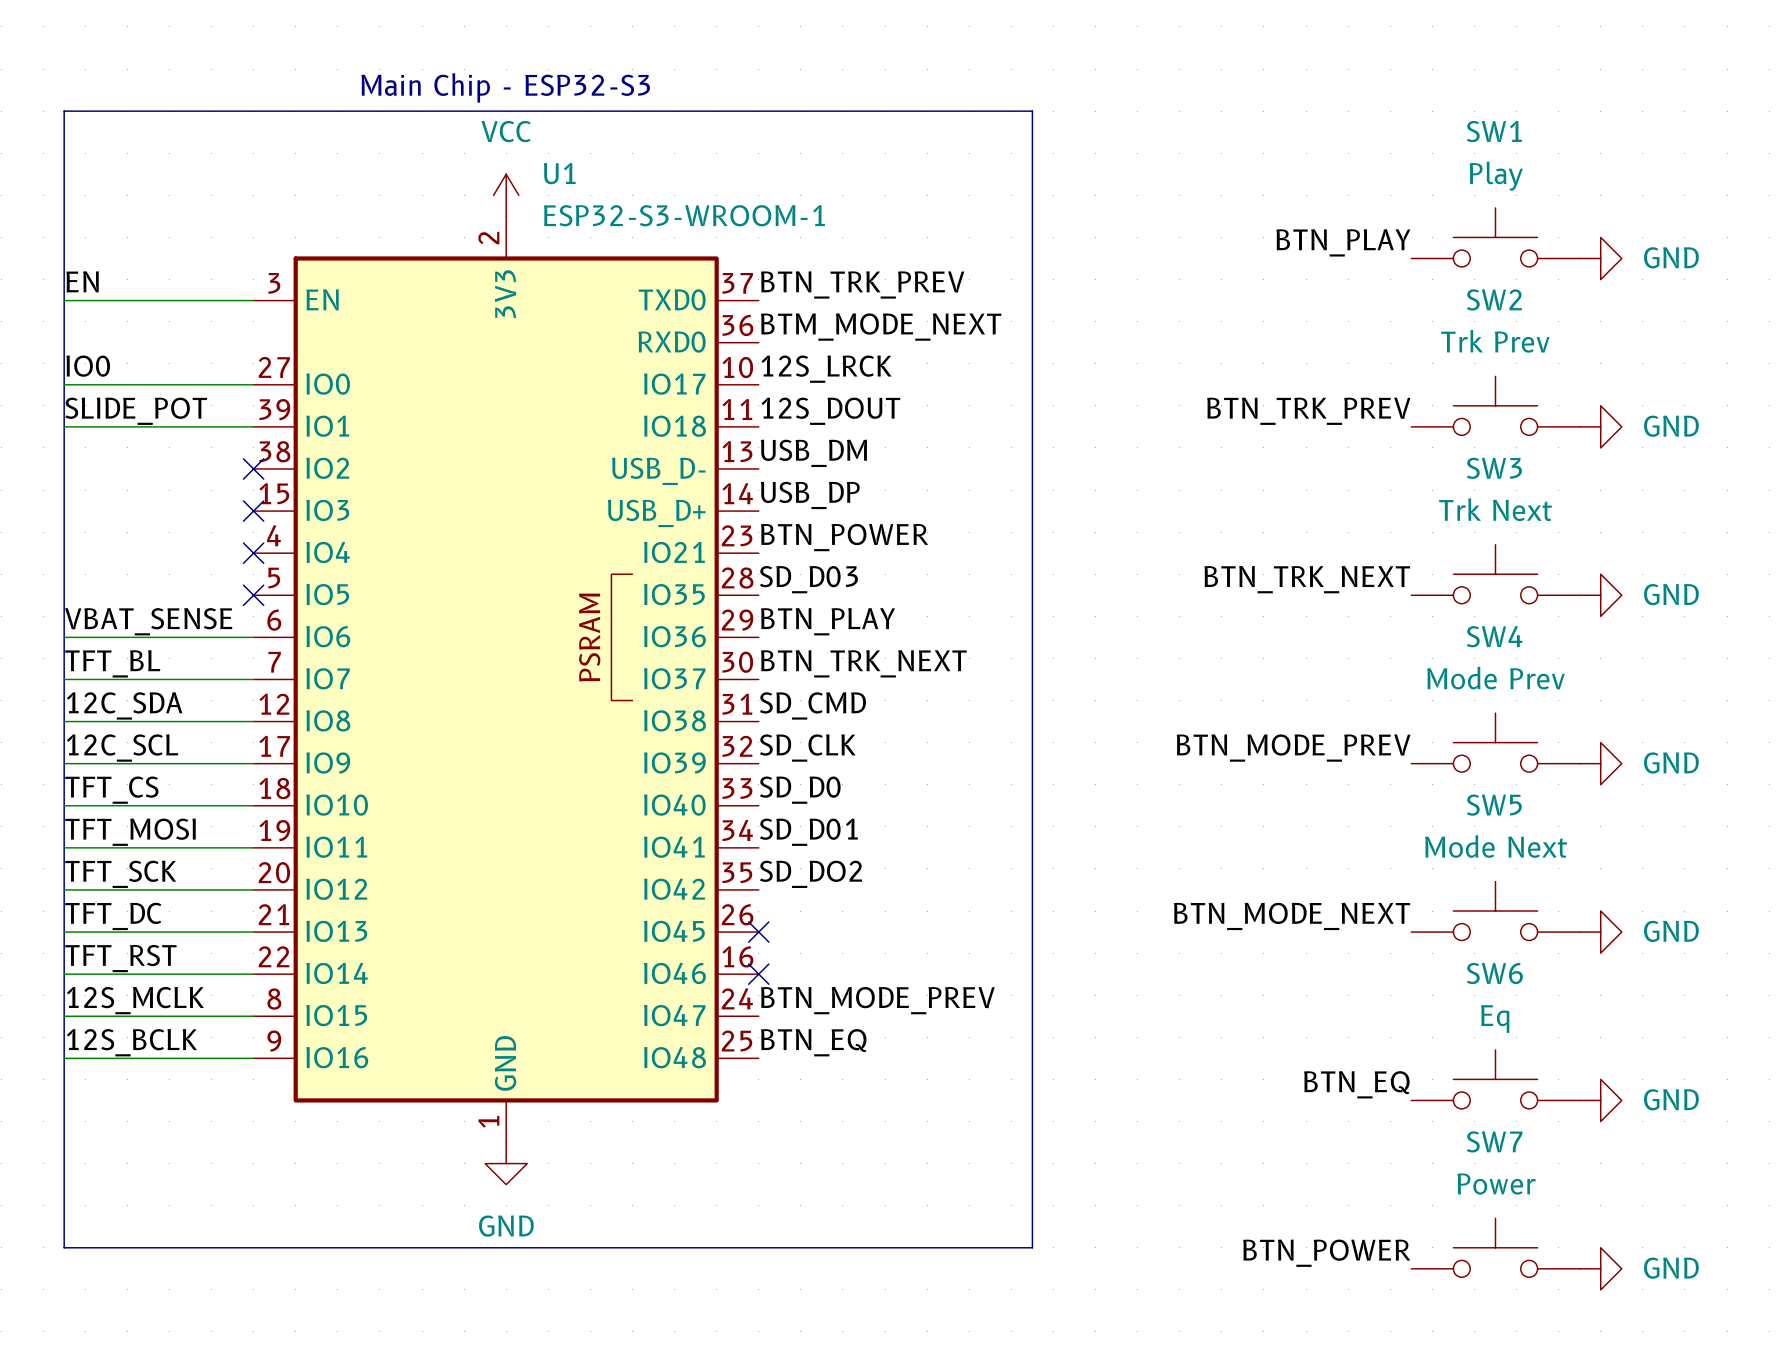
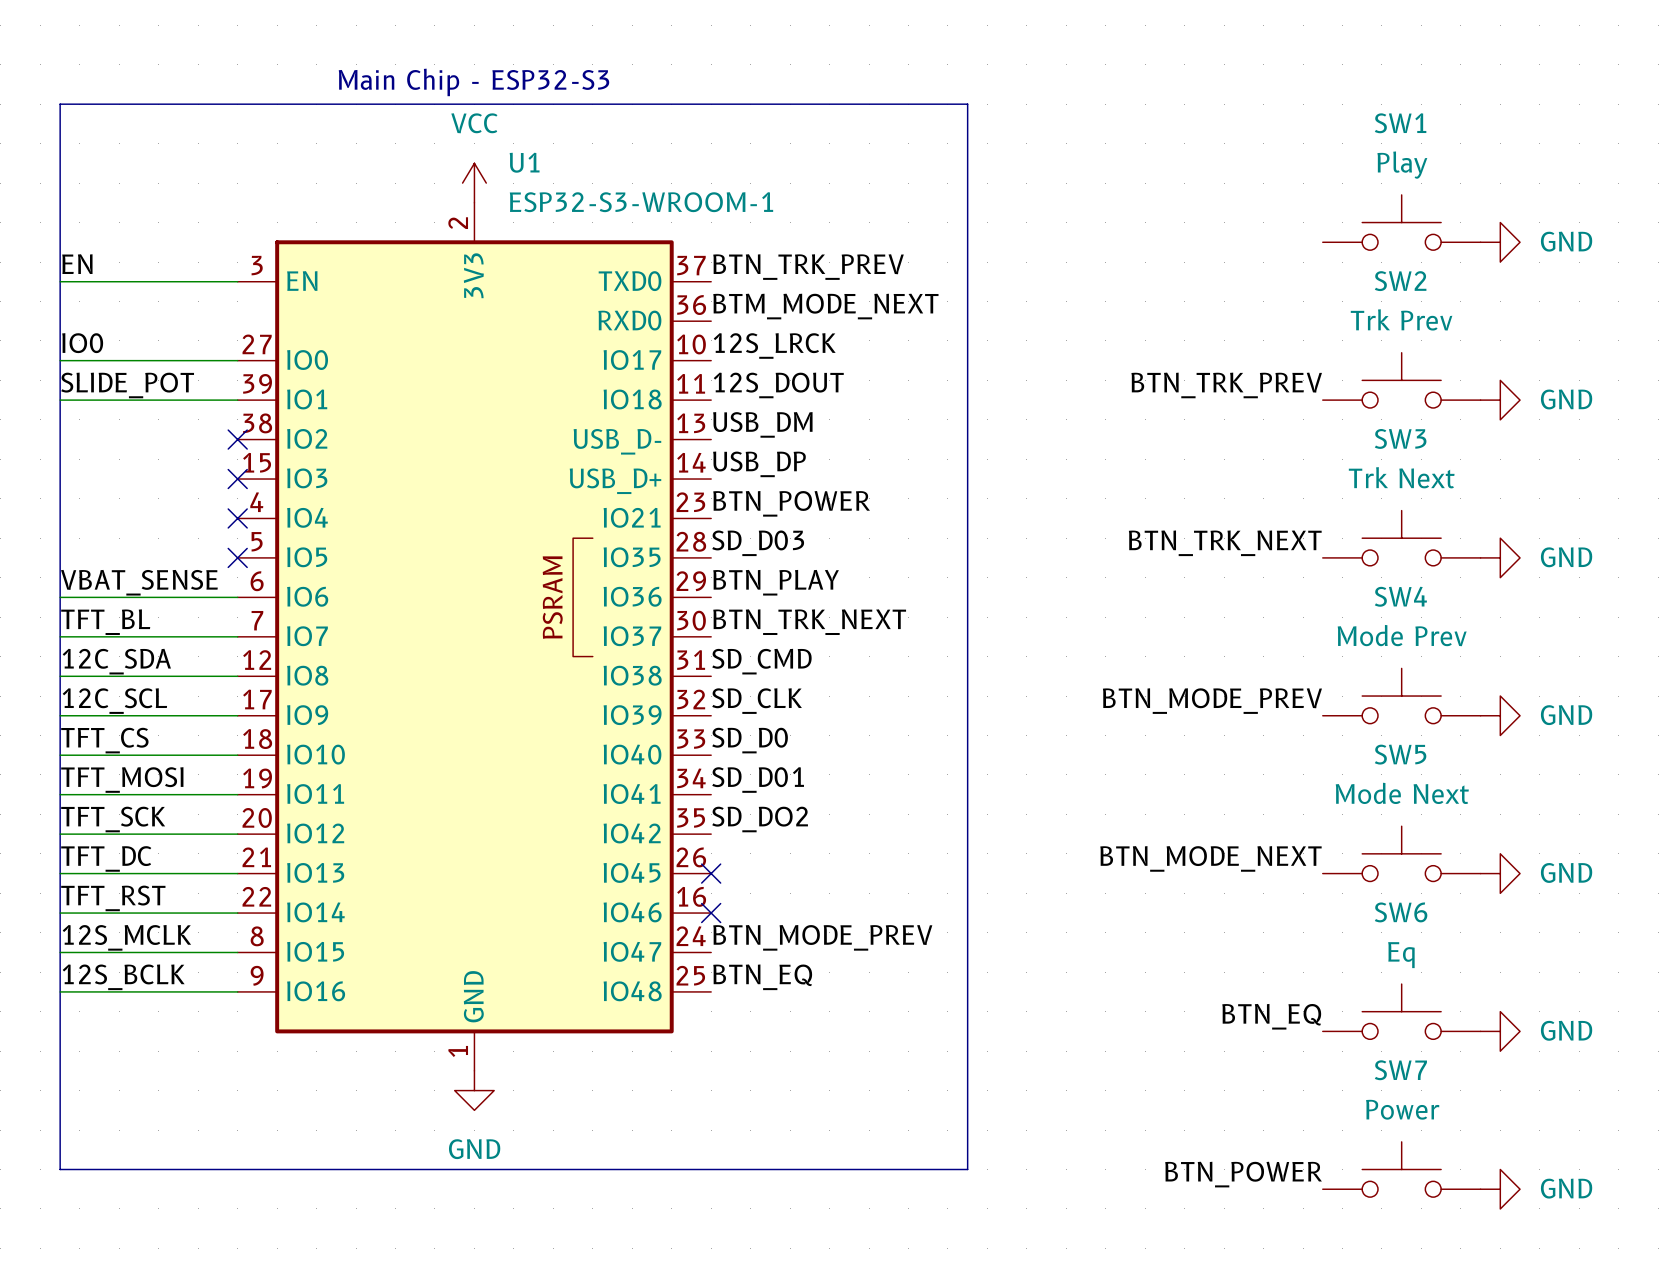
label: BTN_PLAY (1343, 242) -> none

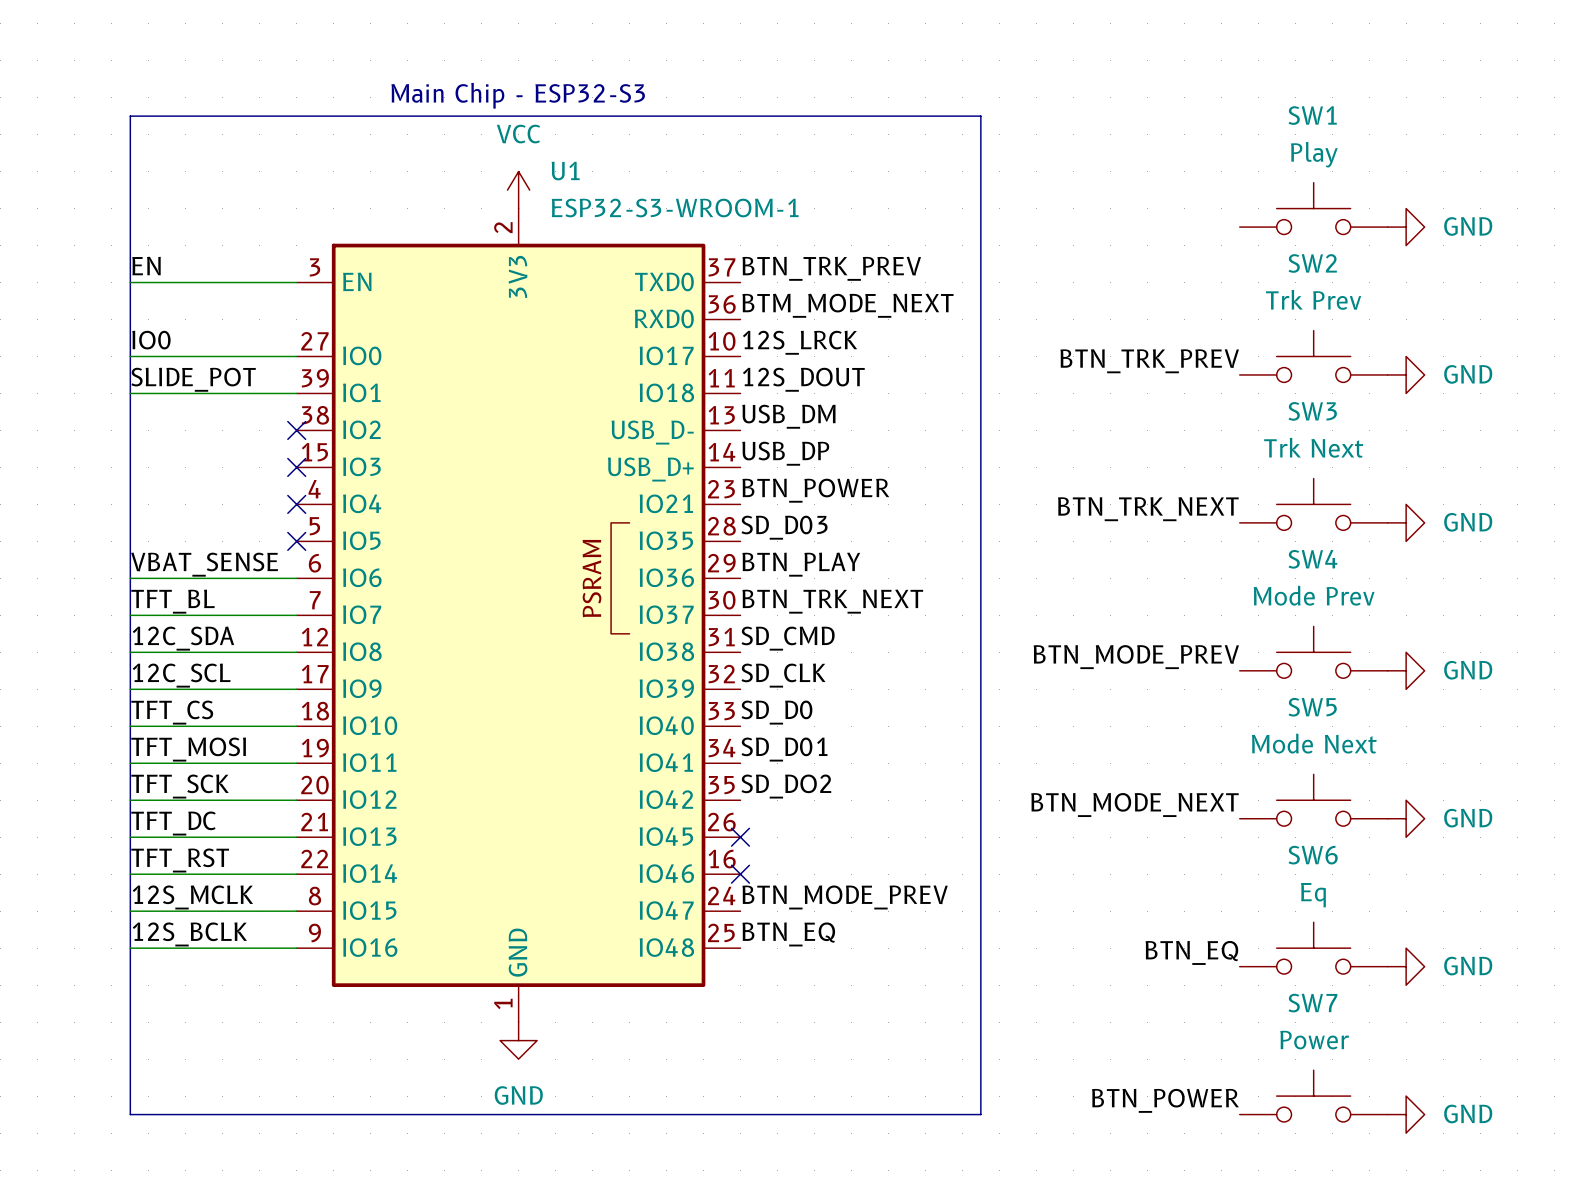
text position: Main Chip - ESP32-S3 (473, 82) -> Main Chip - ESP32-S3 (518, 95)
line: (60, 104) (967, 104) (967, 1169) (60, 1169) (60, 104) -> (130, 116) (980, 116) (980, 1114) (130, 1114) (130, 116)
power symbol position: VCC (474, 183) -> VCC (518, 190)
label position: EN (77, 264) -> EN (146, 266)
label position: BTN_TRK_PREV (808, 267) -> BTN_TRK_PREV (831, 268)
wire: (60, 281) (237, 281) -> (130, 282) (296, 282)
label position: BTM_MODE_NEXT (825, 306) -> BTM_MODE_NEXT (847, 305)
label position: IO0 (82, 343) -> IO0 (151, 340)
label position: 12S_LRCK (774, 345) -> 12S_LRCK (800, 342)
wire: (60, 360) (237, 360) -> (130, 356) (296, 356)
label position: SLIDE_POT (127, 385) -> SLIDE_POT (193, 379)
label position: 12S_DOUT (778, 385) -> 12S_DOUT (803, 379)
wire: (60, 400) (237, 400) -> (130, 393) (296, 393)
label position: USB_DM (762, 424) -> USB_DM (788, 416)
no-connect mark: (237, 439) -> none
no-connect mark: none -> (296, 430)
label position: USB_DP (759, 464) -> USB_DP (785, 453)
no-connect mark: (237, 479) -> none
no-connect mark: none -> (296, 467)
label position: BTN_POWER (791, 503) -> BTN_POWER (815, 490)
no-connect mark: (237, 518) -> none
no-connect mark: none -> (296, 504)
label position: SD_D03 (758, 543) -> SD_D03 (784, 527)
no-connect mark: (237, 557) -> none
no-connect mark: none -> (296, 541)
label position: VBAT_SENSE (139, 582) -> VBAT_SENSE (204, 564)
label position: BTN_PLAY (776, 582) -> BTN_PLAY (801, 564)
wire: (60, 597) (237, 597) -> (130, 578) (296, 578)
label position: TFT_BL (105, 622) -> TFT_BL (173, 601)
label position: BTN_TRK_NEXT (809, 622) -> BTN_TRK_NEXT (832, 601)
wire: (60, 636) (237, 636) -> (130, 615) (296, 615)
U1 position: (474, 636) -> (518, 615)
label position: 12C_SDA (116, 661) -> 12C_SDA (183, 638)
label position: SD_CMD (761, 661) -> SD_CMD (788, 638)
wire: (60, 676) (237, 676) -> (130, 652) (296, 652)
label position: 12C_SCL (114, 701) -> 12C_SCL (181, 675)
label position: SD_CLK (757, 701) -> SD_CLK (783, 675)
wire: (60, 715) (237, 715) -> (130, 689) (296, 689)
label position: TFT_CS (104, 740) -> TFT_CS (172, 712)
label position: SD_D0 (750, 740) -> SD_D0 (776, 712)
wire: (60, 755) (237, 755) -> (130, 726) (296, 726)
label position: TFT_MOSI (122, 780) -> TFT_MOSI (188, 749)
label position: SD_D01 (758, 780) -> SD_D01 (784, 749)
wire: (60, 794) (237, 794) -> (130, 763) (296, 763)
label position: TFT_SCK (113, 819) -> TFT_SCK (180, 786)
label position: SD_DO2 (760, 819) -> SD_DO2 (786, 786)
wire: (60, 834) (237, 834) -> (130, 800) (296, 800)
label position: TFT_DC (106, 858) -> TFT_DC (173, 823)
wire: (60, 873) (237, 873) -> (130, 837) (296, 837)
no-connect mark: (711, 873) -> none
no-connect mark: none -> (740, 837)
label position: TFT_RST (113, 898) -> TFT_RST (180, 860)
wire: (60, 913) (237, 913) -> (130, 874) (296, 874)
no-connect mark: (711, 913) -> none
no-connect mark: none -> (740, 874)
label position: 12S_MCLK (126, 937) -> 12S_MCLK (192, 897)
label position: BTN_MODE_PREV (822, 937) -> BTN_MODE_PREV (845, 897)
wire: (60, 952) (237, 952) -> (130, 911) (296, 911)
label position: 12S_BCLK (123, 977) -> 12S_BCLK (189, 934)
label position: BTN_EQ (762, 977) -> BTN_EQ (788, 934)
wire: (60, 991) (237, 991) -> (130, 948) (296, 948)
power symbol position: GND (474, 1090) -> GND (518, 1040)

